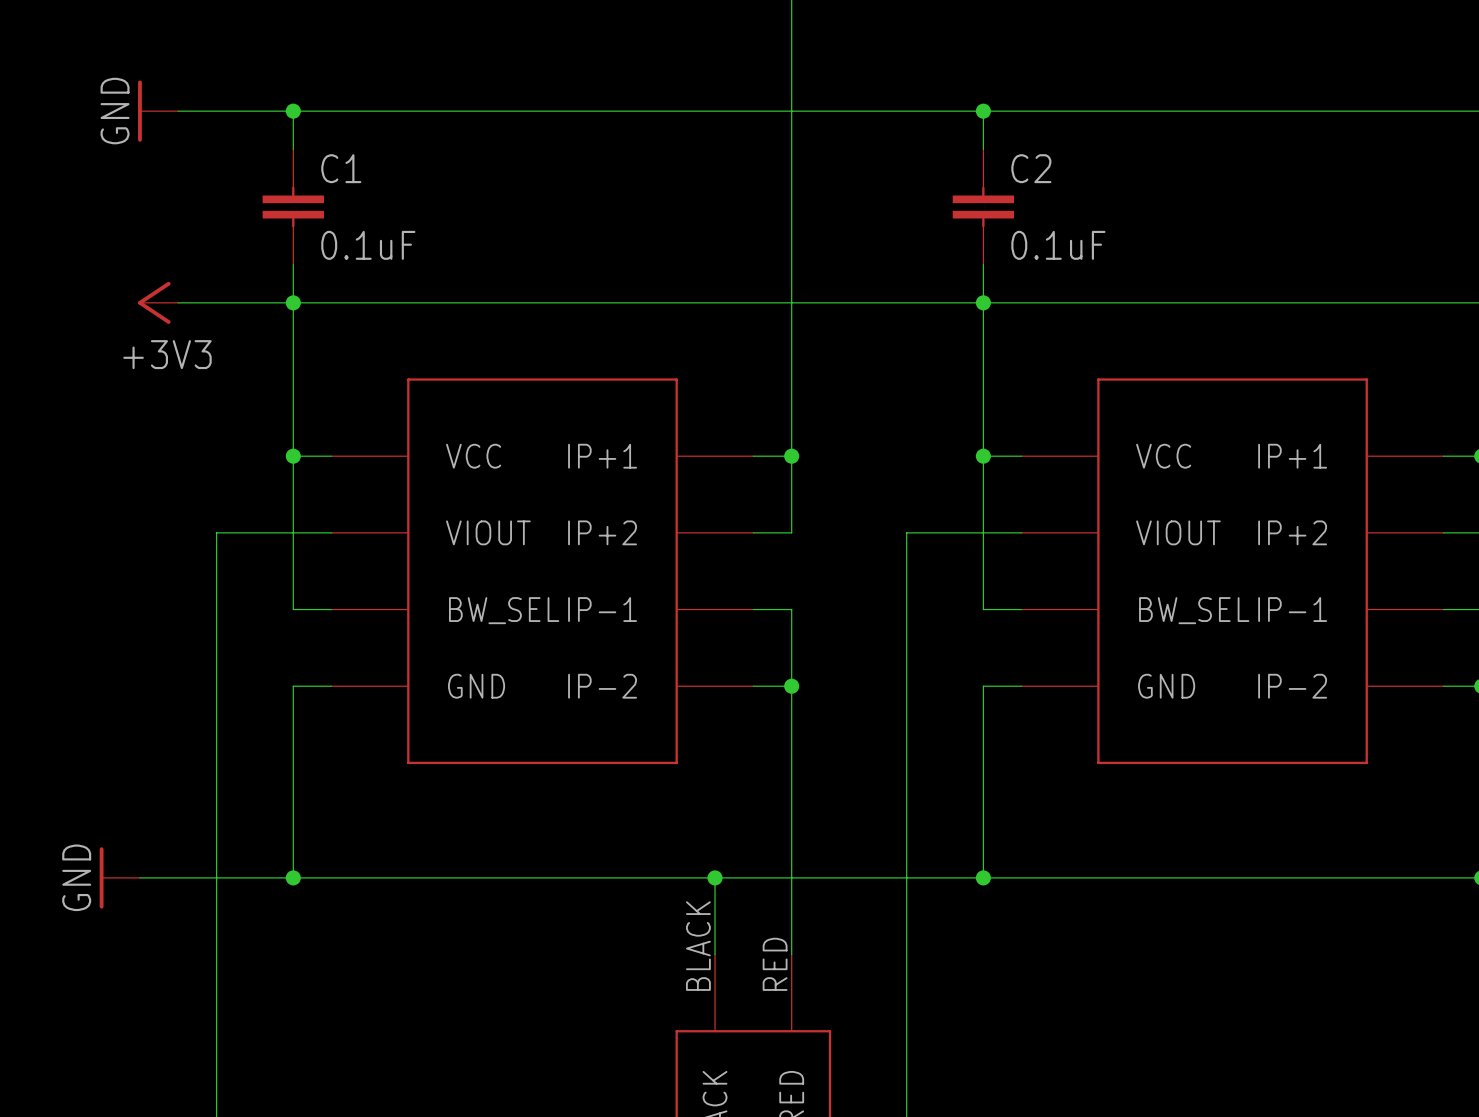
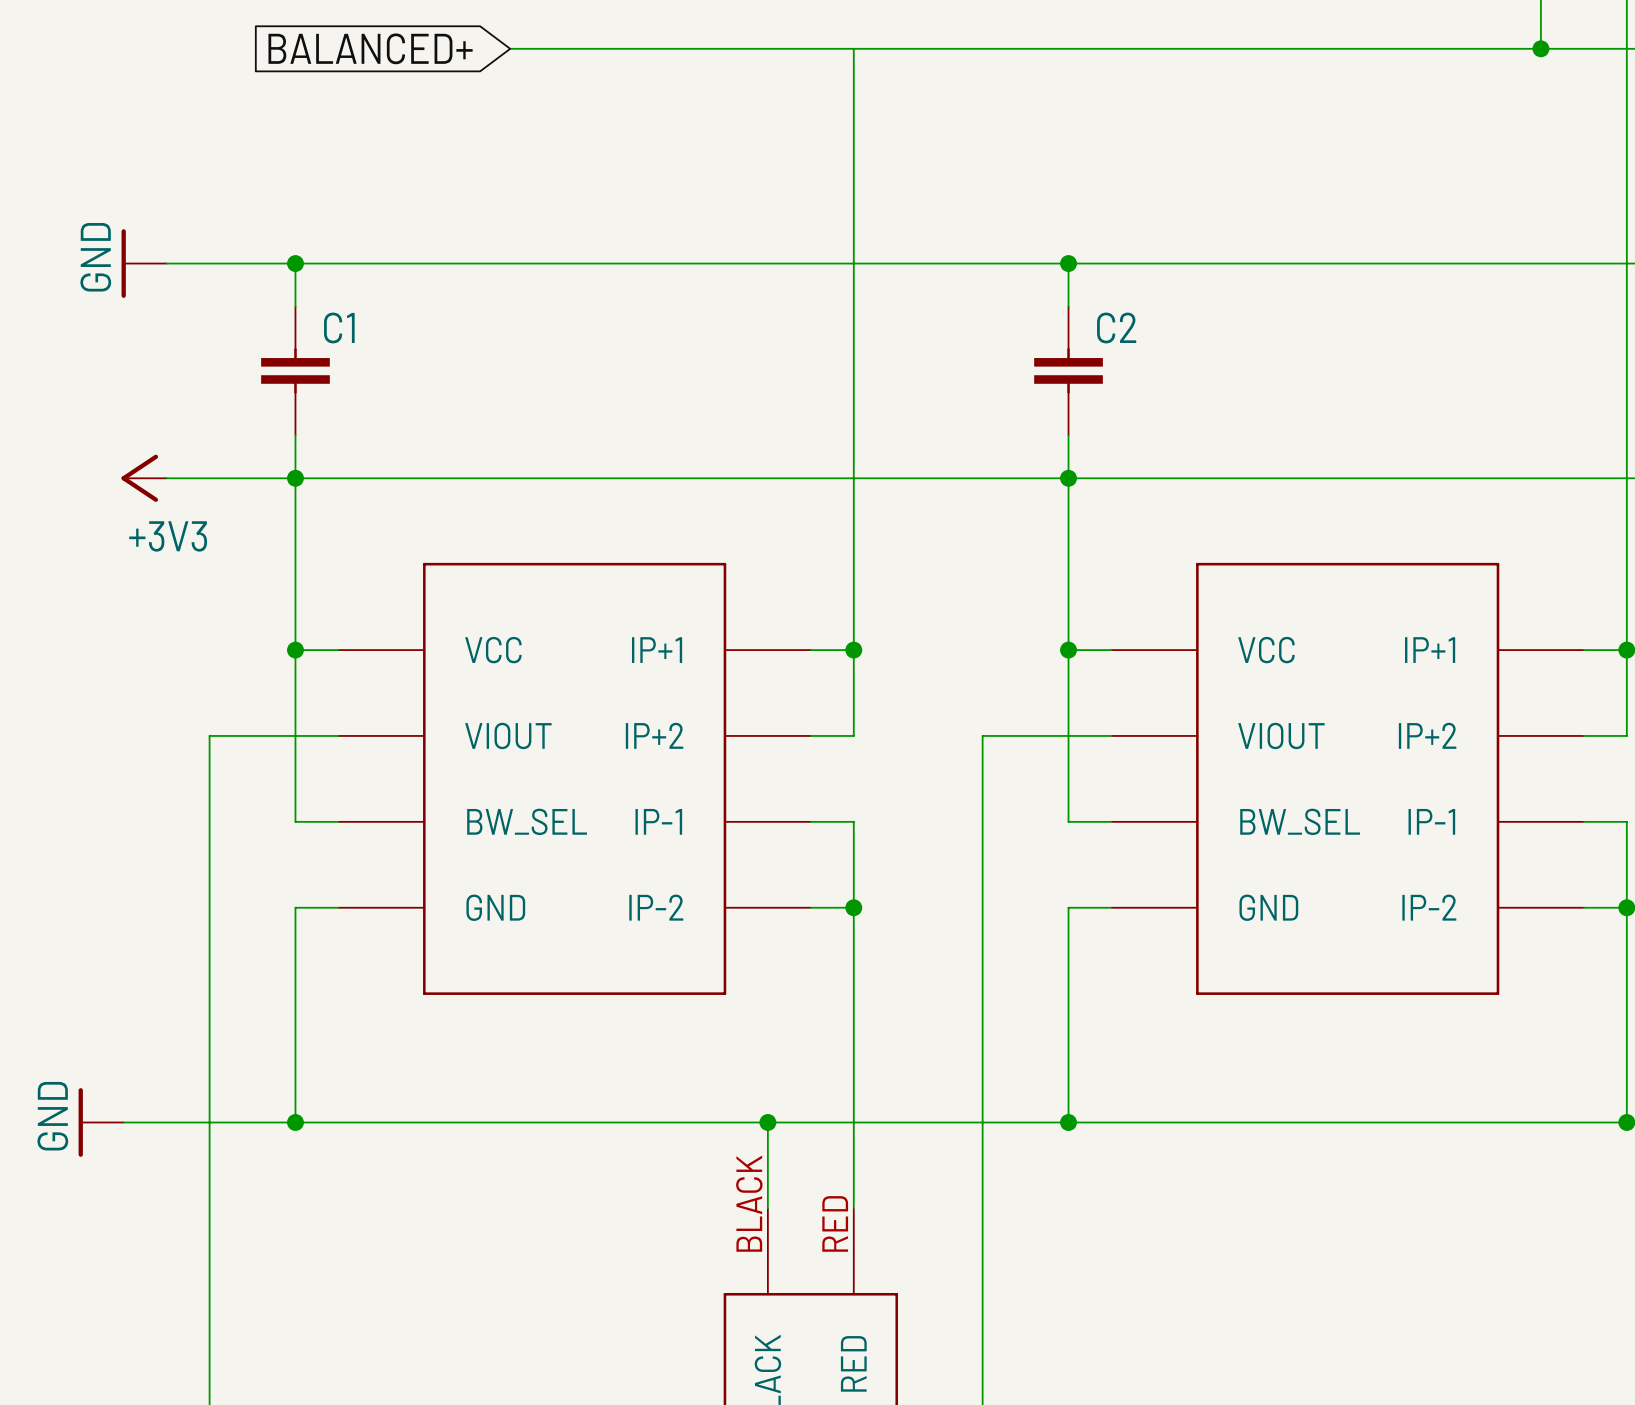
C1 value: 0.1uF (368, 245) -> none
C2 value: 0.1uF (1058, 245) -> none

